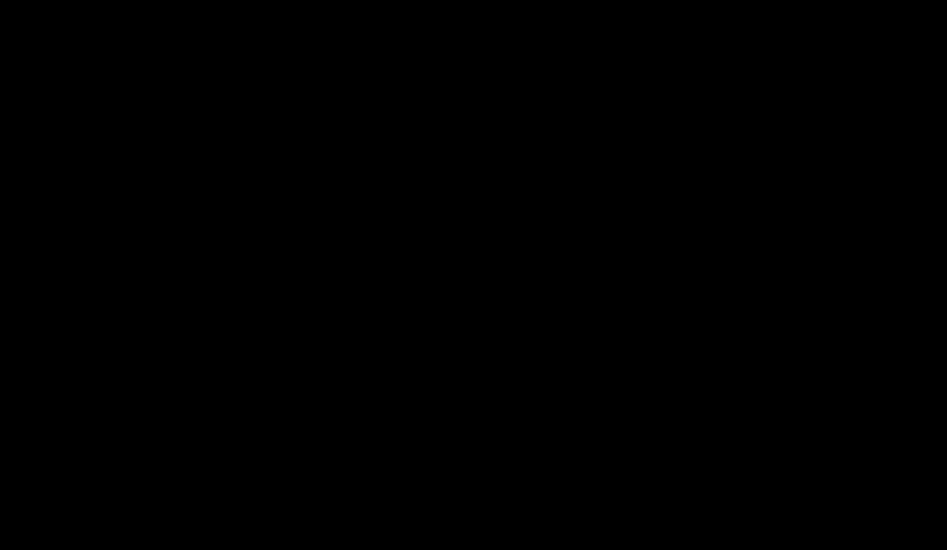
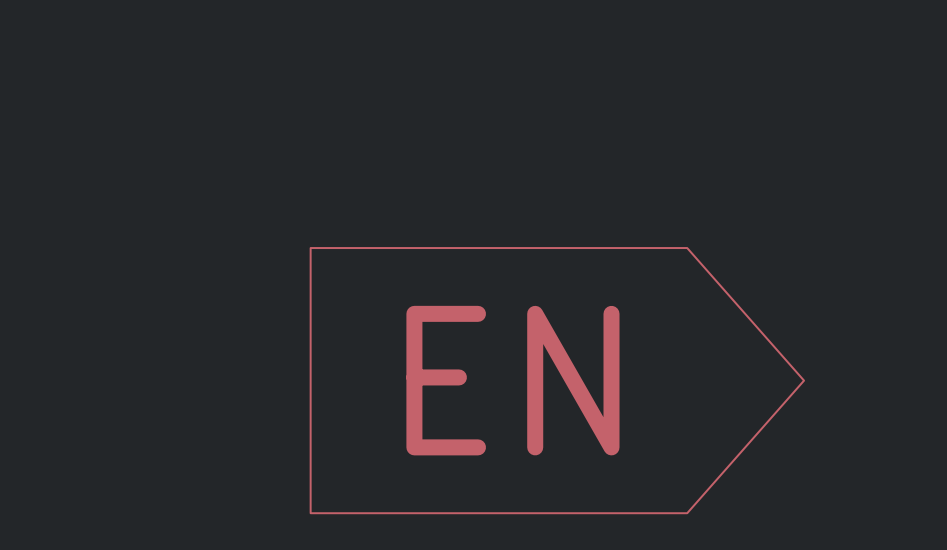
global label: none -> EN (512, 380)

